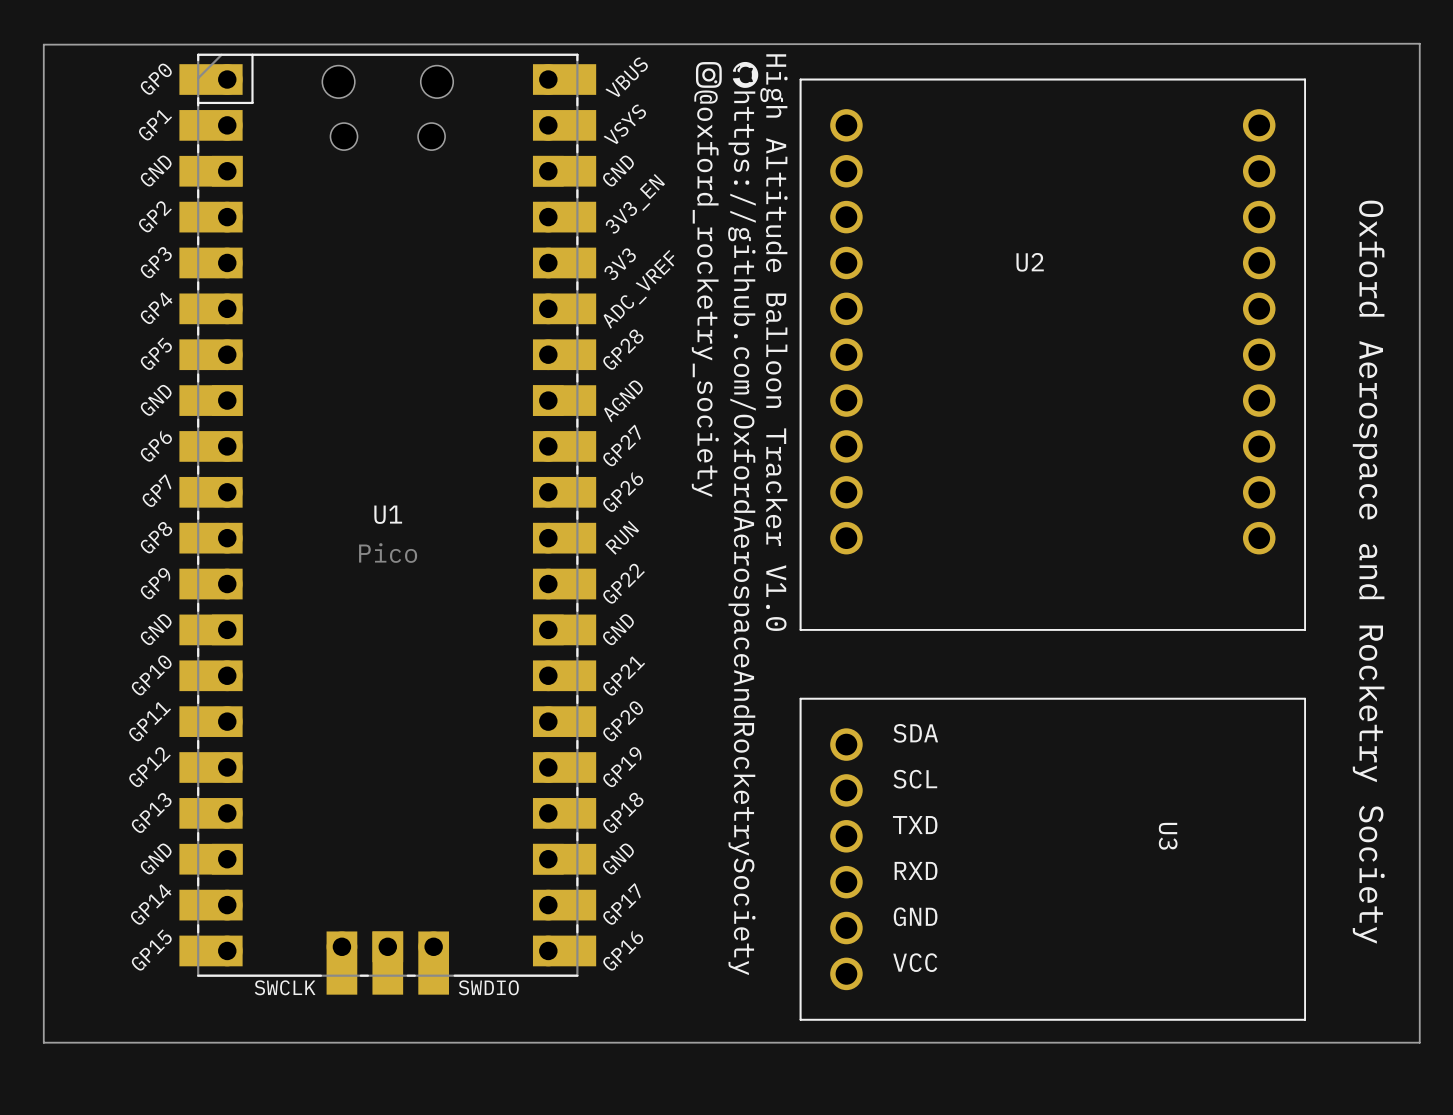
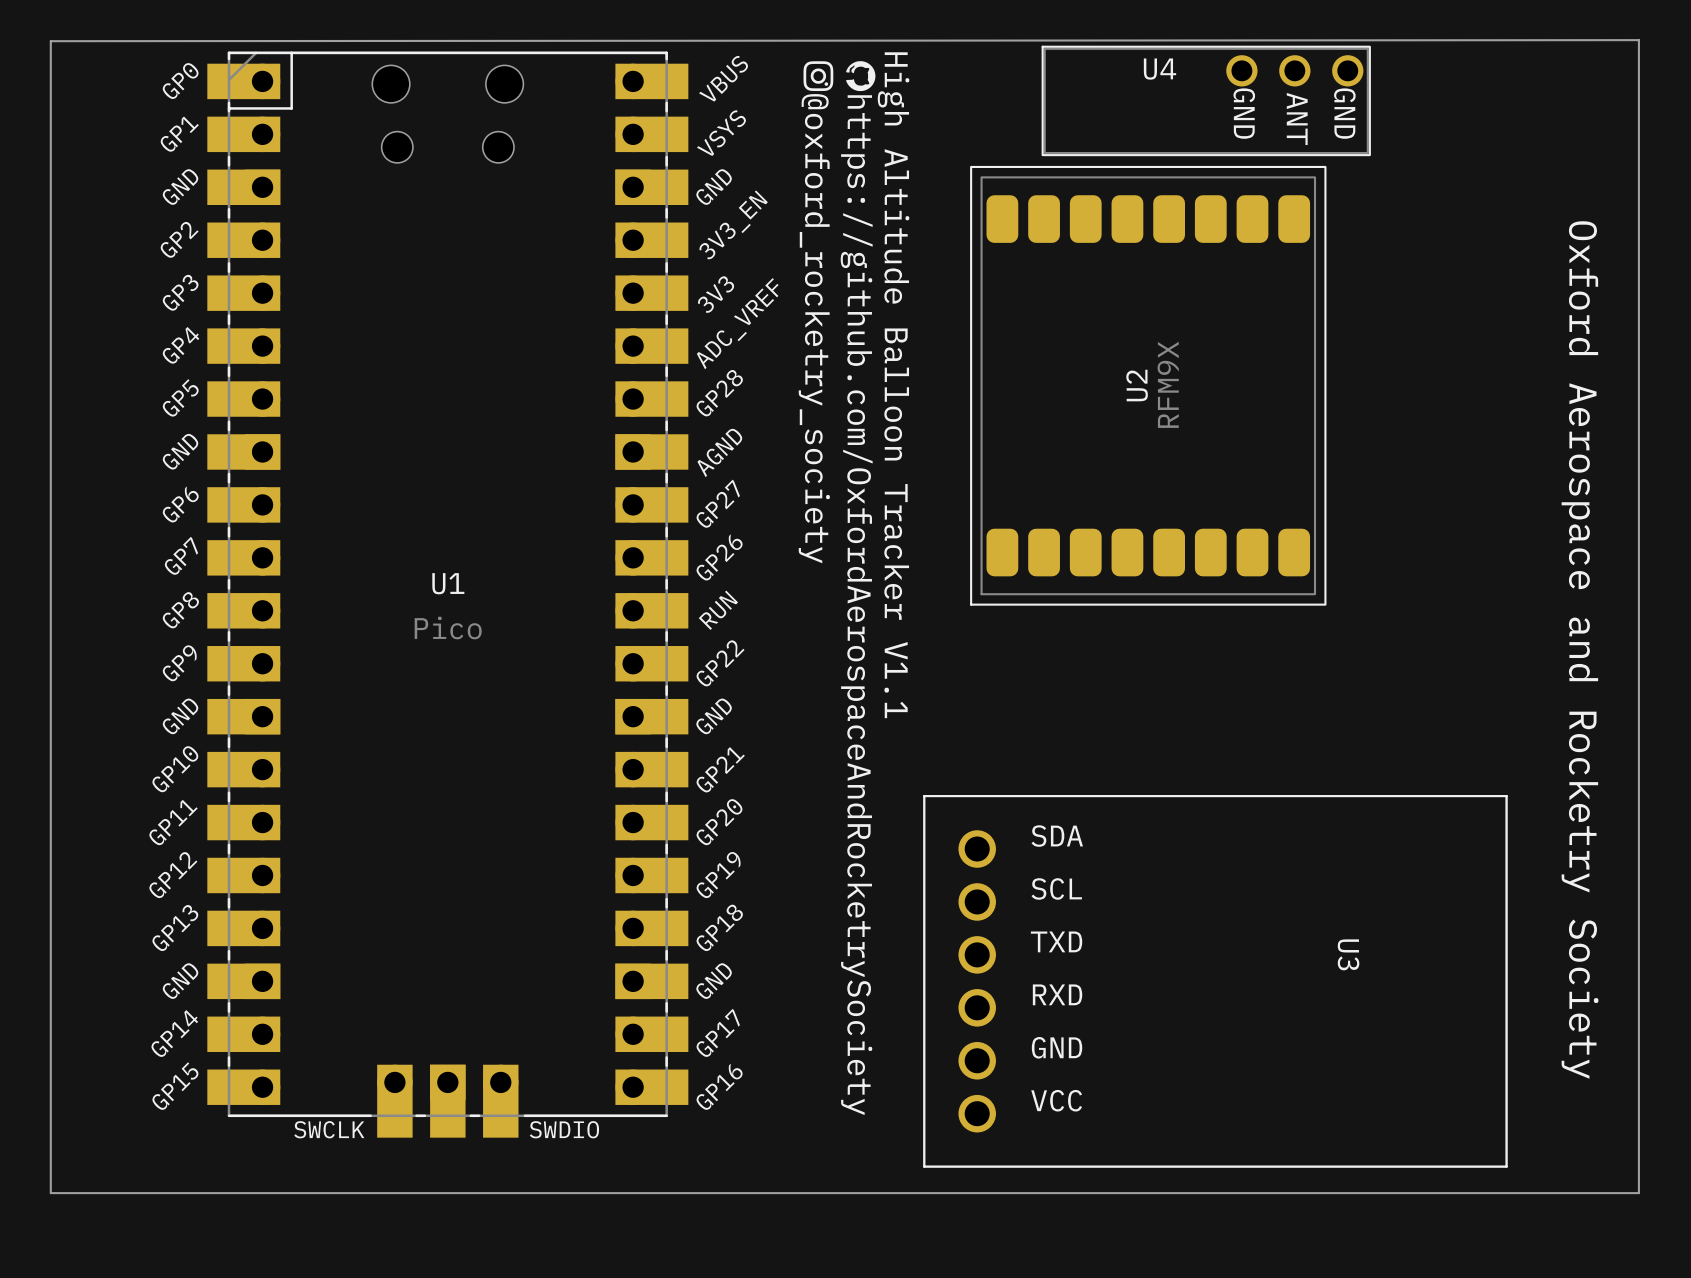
U2 footprint: [799, 78, 1307, 631] -> [970, 165, 1327, 606]
U4: none -> (1206, 100)
U2 name position: U2 (1030, 262) -> U2 (1137, 385)
text: High Altitude Balloon Tracker V1.0 (773, 342) -> High Altitude Balloon Tracker V1.1 (893, 385)
U2 value: none -> RFM9X (1168, 384)

